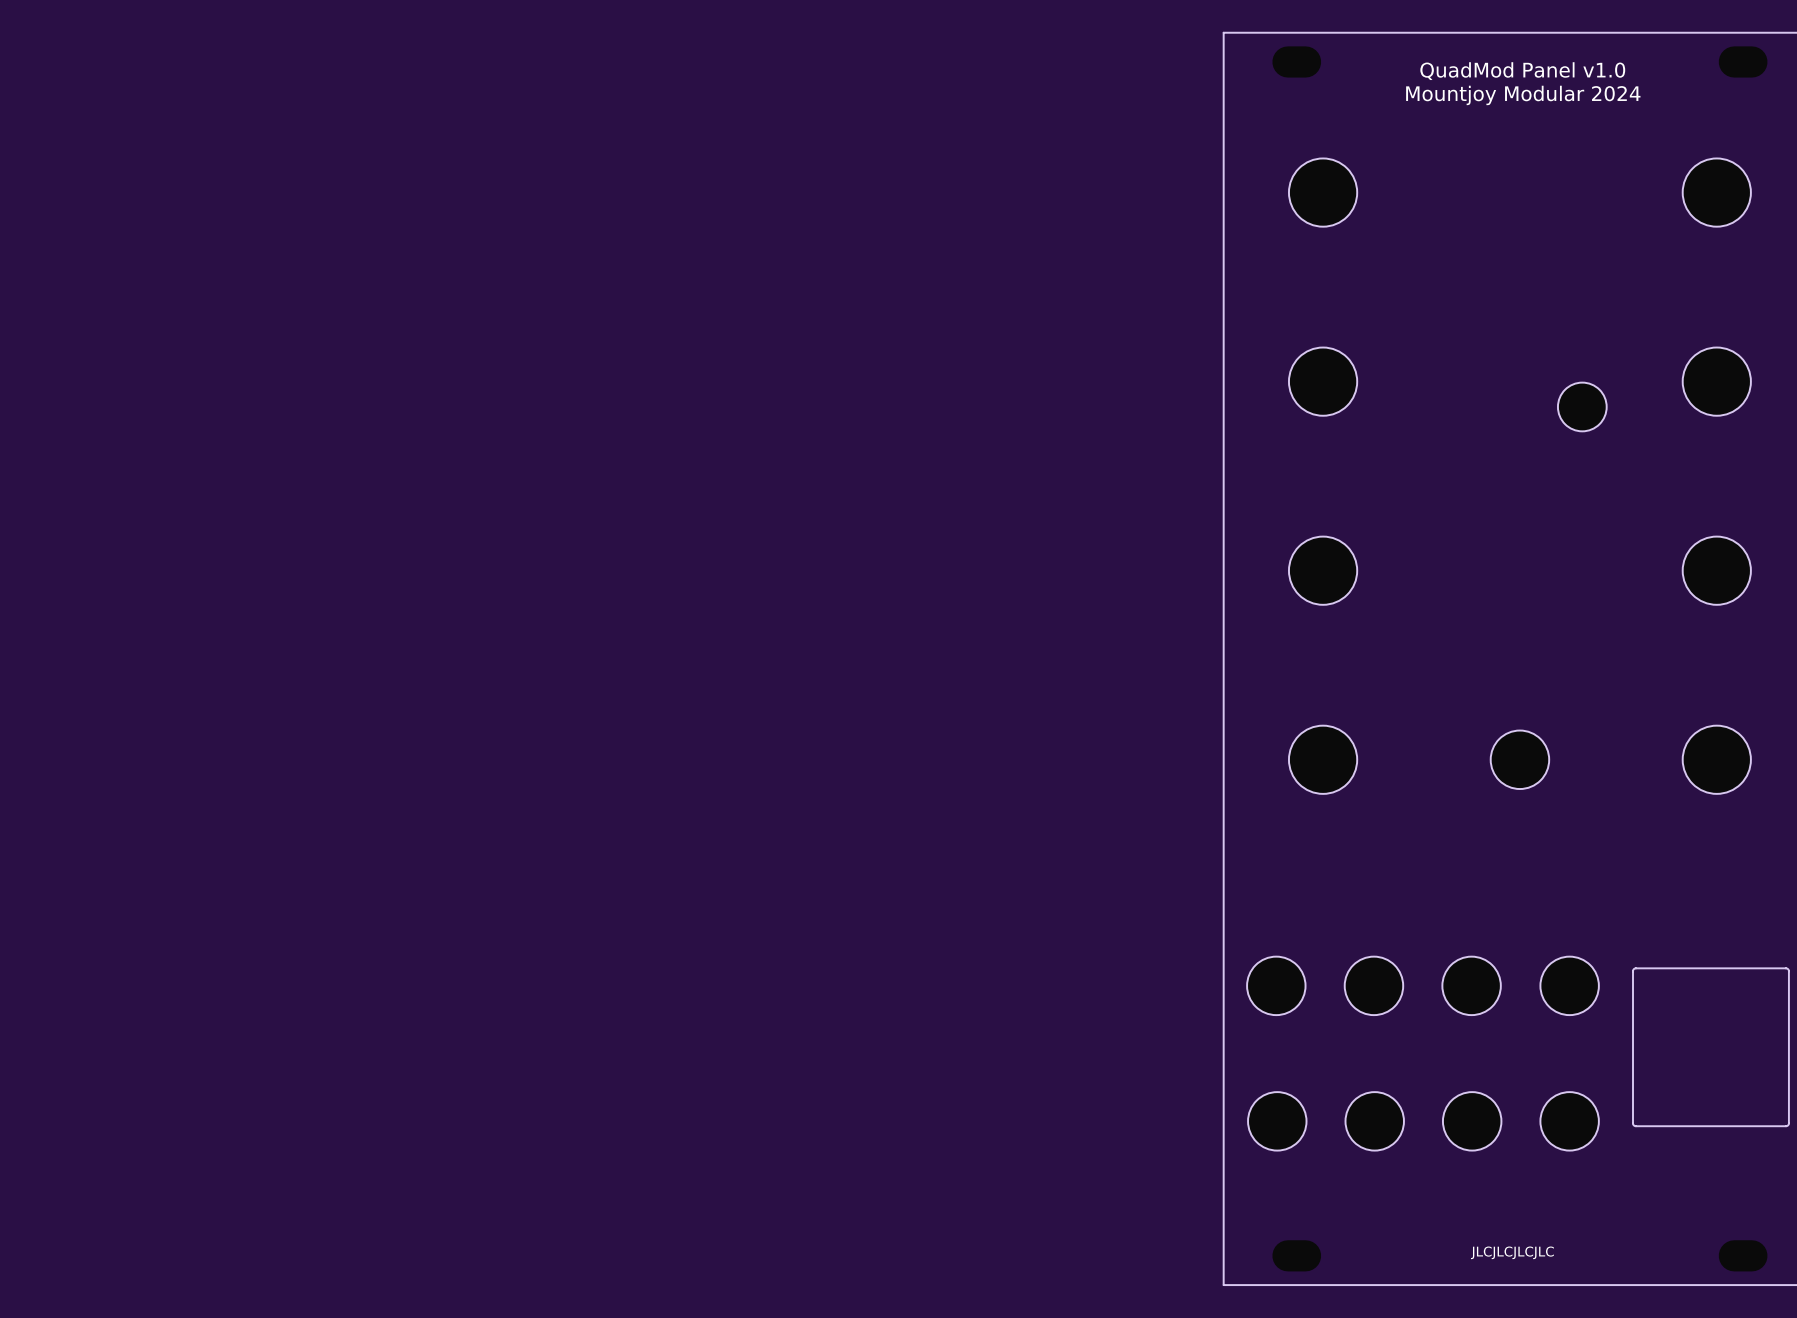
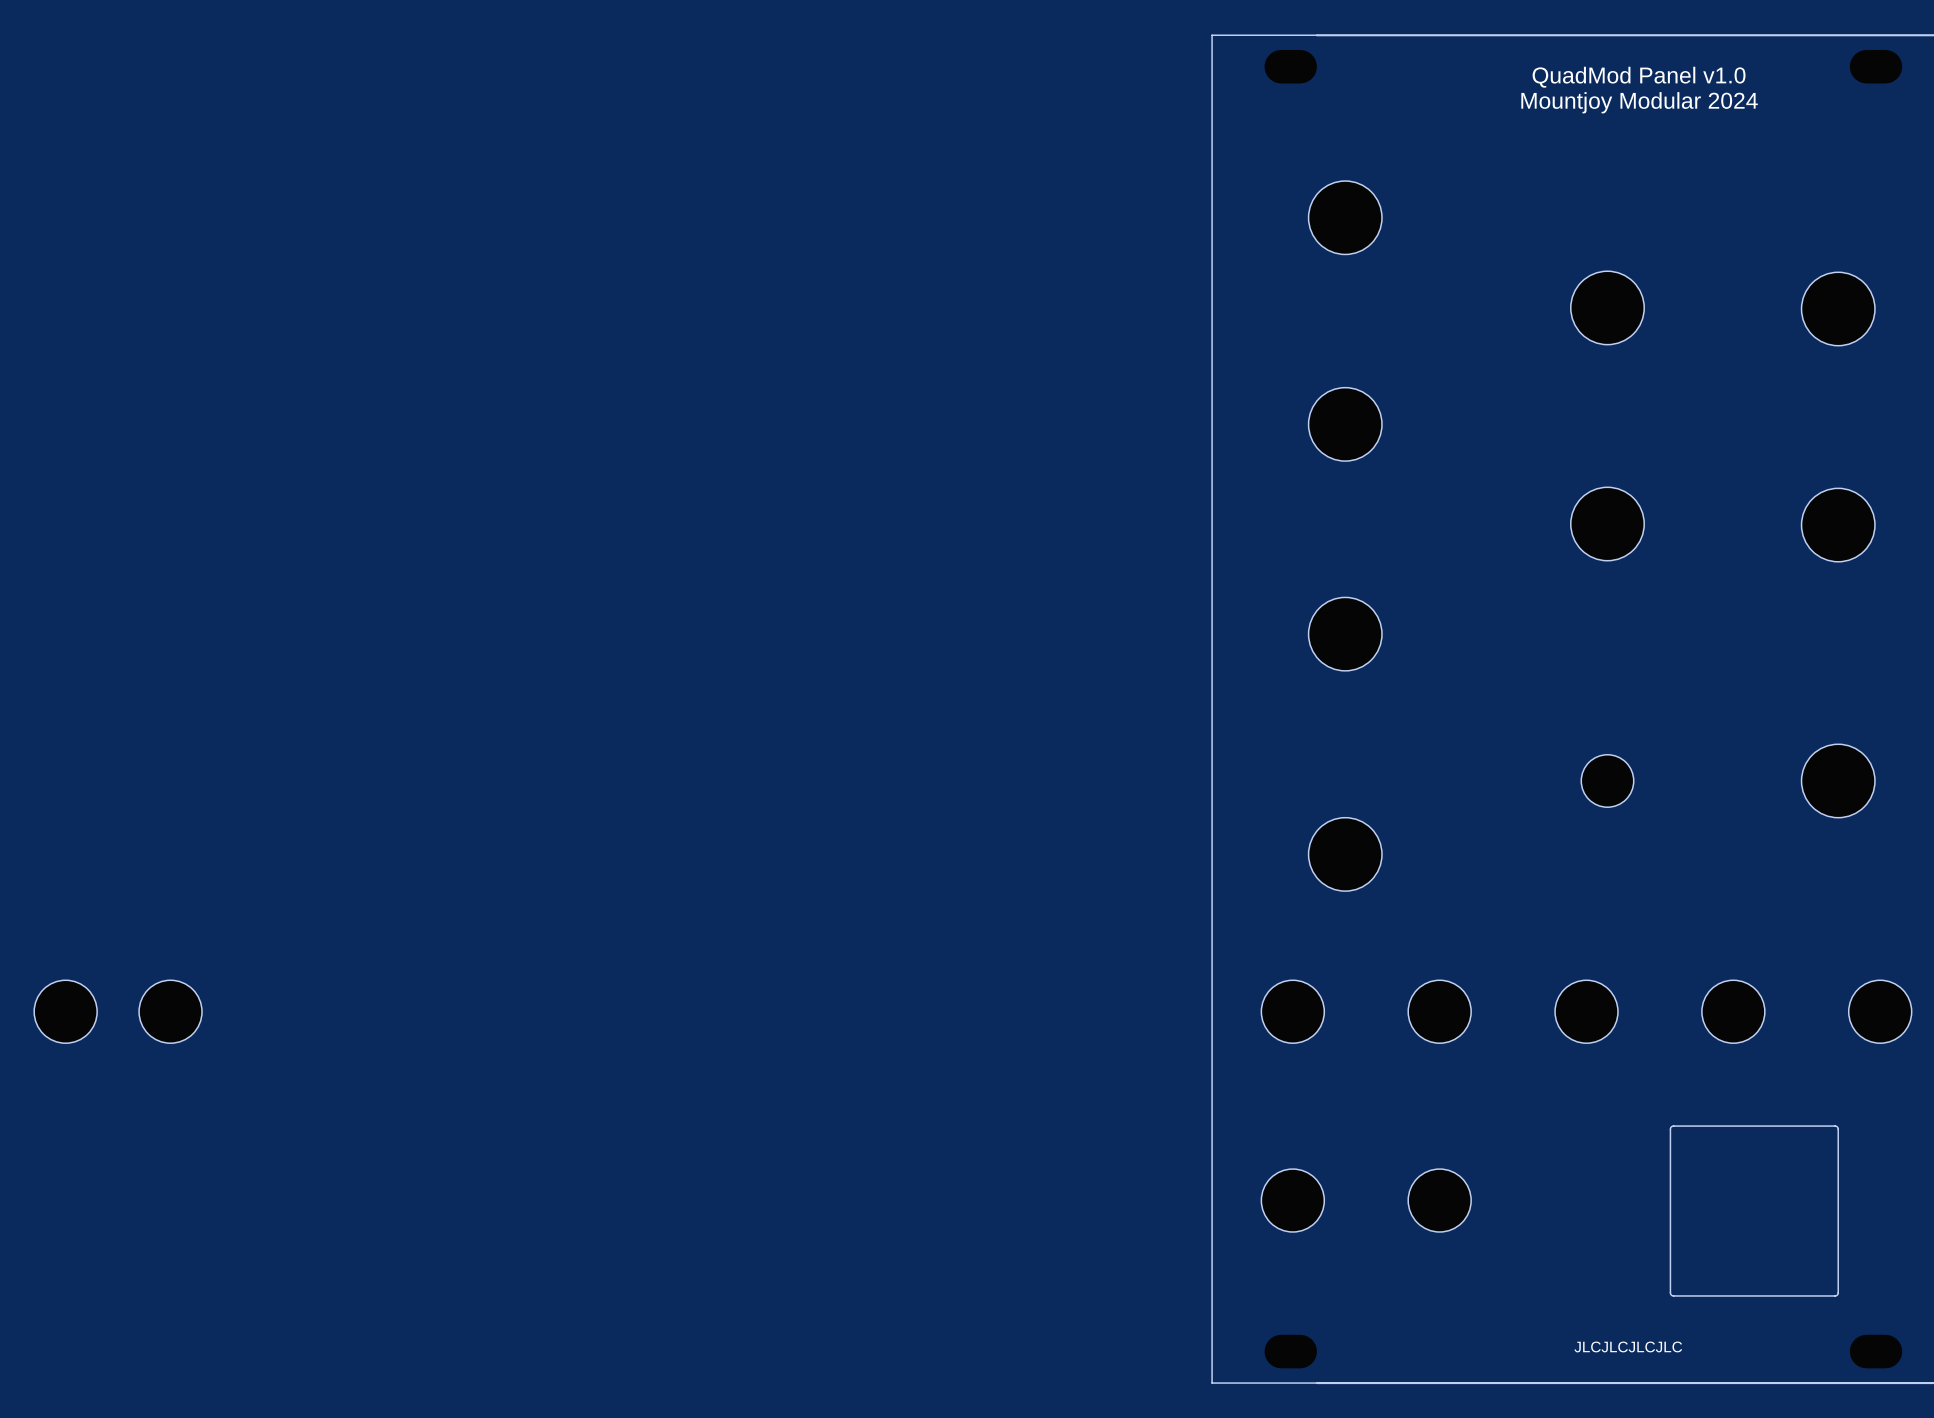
board edge: (1223, 32) (1223, 1285) -> (1316, 35) (1212, 35) (1212, 1383) (1316, 1383)
part position: (1296, 61) -> (1290, 66)
part position: (1323, 192) -> (1345, 217)
part: (1716, 192) -> none
part: none -> (1607, 307)
part: none -> (1838, 308)
part position: (1323, 381) -> (1345, 424)
part: (1716, 381) -> none
part: (1582, 406) -> none
part: none -> (1607, 524)
part: none -> (1838, 525)
part position: (1323, 570) -> (1345, 634)
part: (1716, 570) -> none
part: none -> (1607, 780)
part position: (1323, 759) -> (1345, 854)
part: (1519, 759) -> none
part position: (1716, 759) -> (1838, 780)
part: none -> (65, 1011)
part: none -> (170, 1011)
part: none -> (1292, 1011)
part: none -> (1439, 1011)
part: none -> (1733, 1011)
part: none -> (1880, 1011)
part: (1276, 985) -> none
part: (1373, 985) -> none
part position: (1471, 985) -> (1586, 1011)
part: (1569, 985) -> none
drawing position: (1710, 1047) -> (1754, 1211)
part: none -> (1292, 1200)
part: none -> (1439, 1200)
part: (1277, 1121) -> none
part: (1374, 1121) -> none
part: (1472, 1121) -> none
part: (1569, 1121) -> none
part position: (1296, 1255) -> (1290, 1351)

